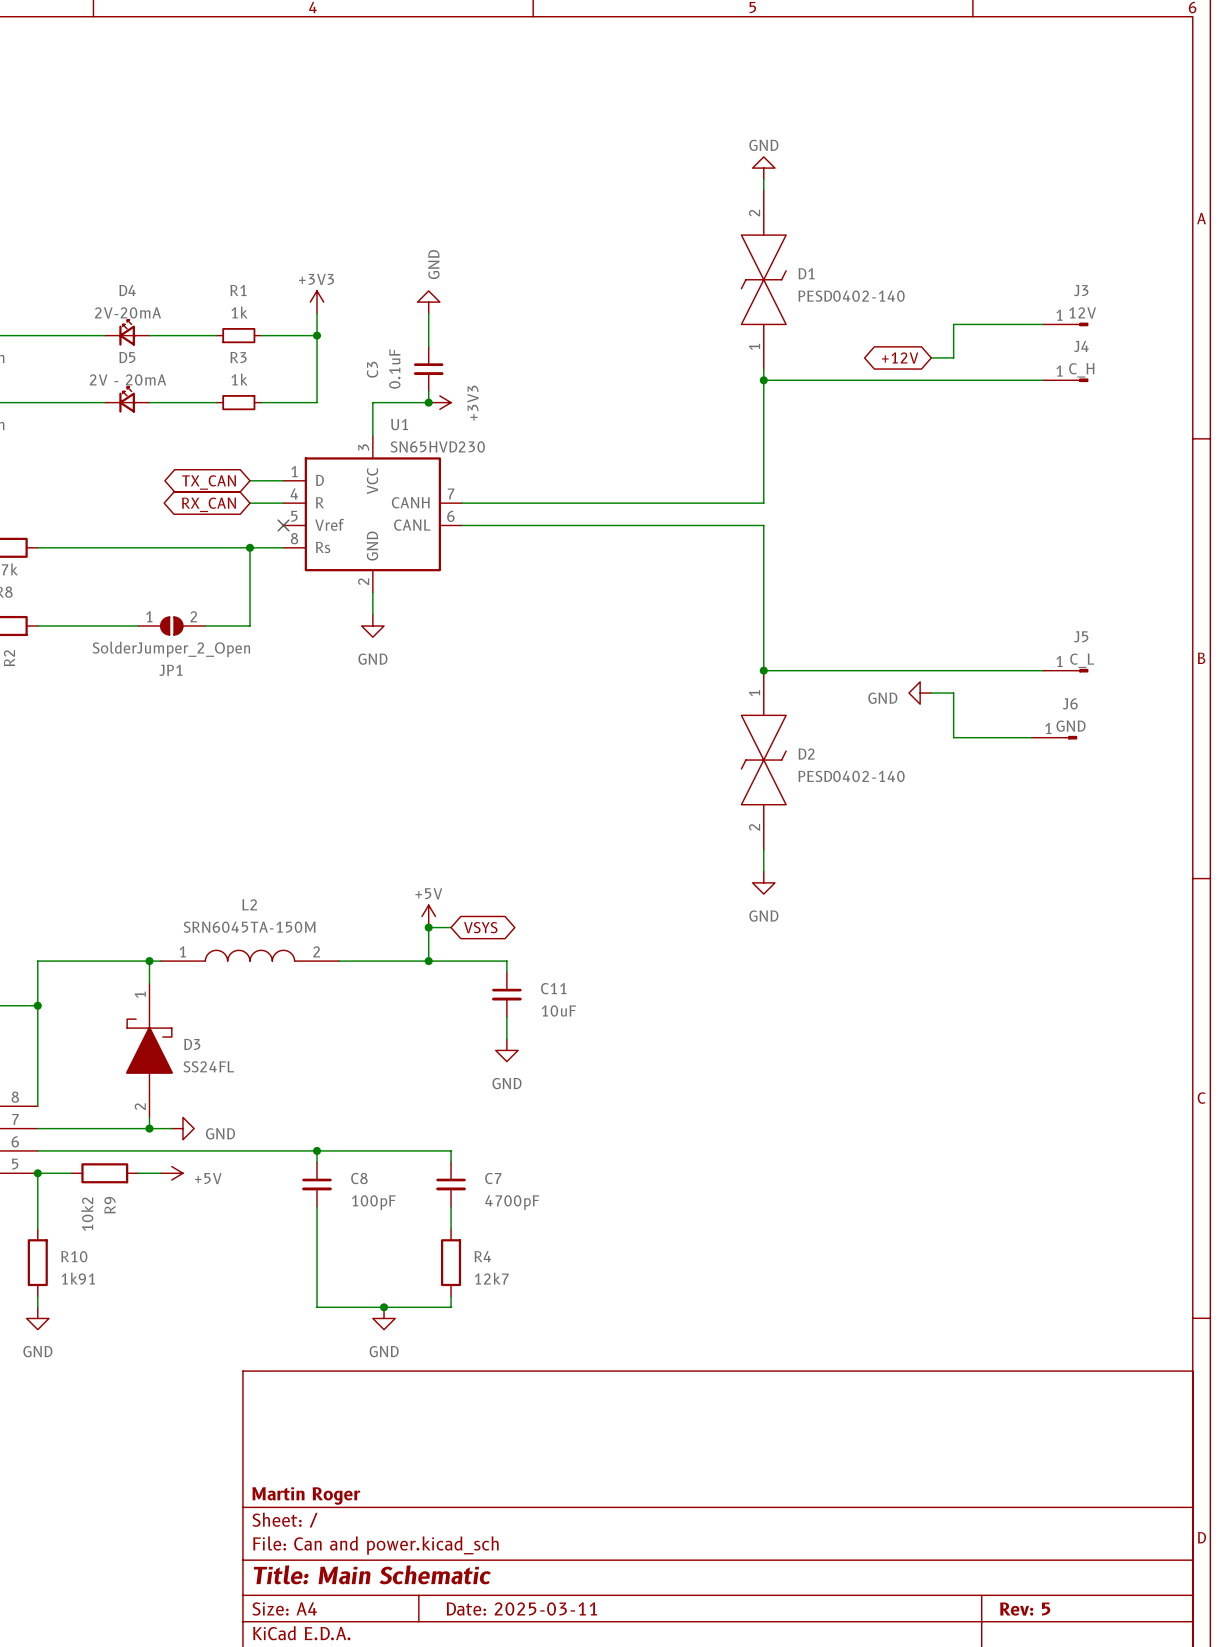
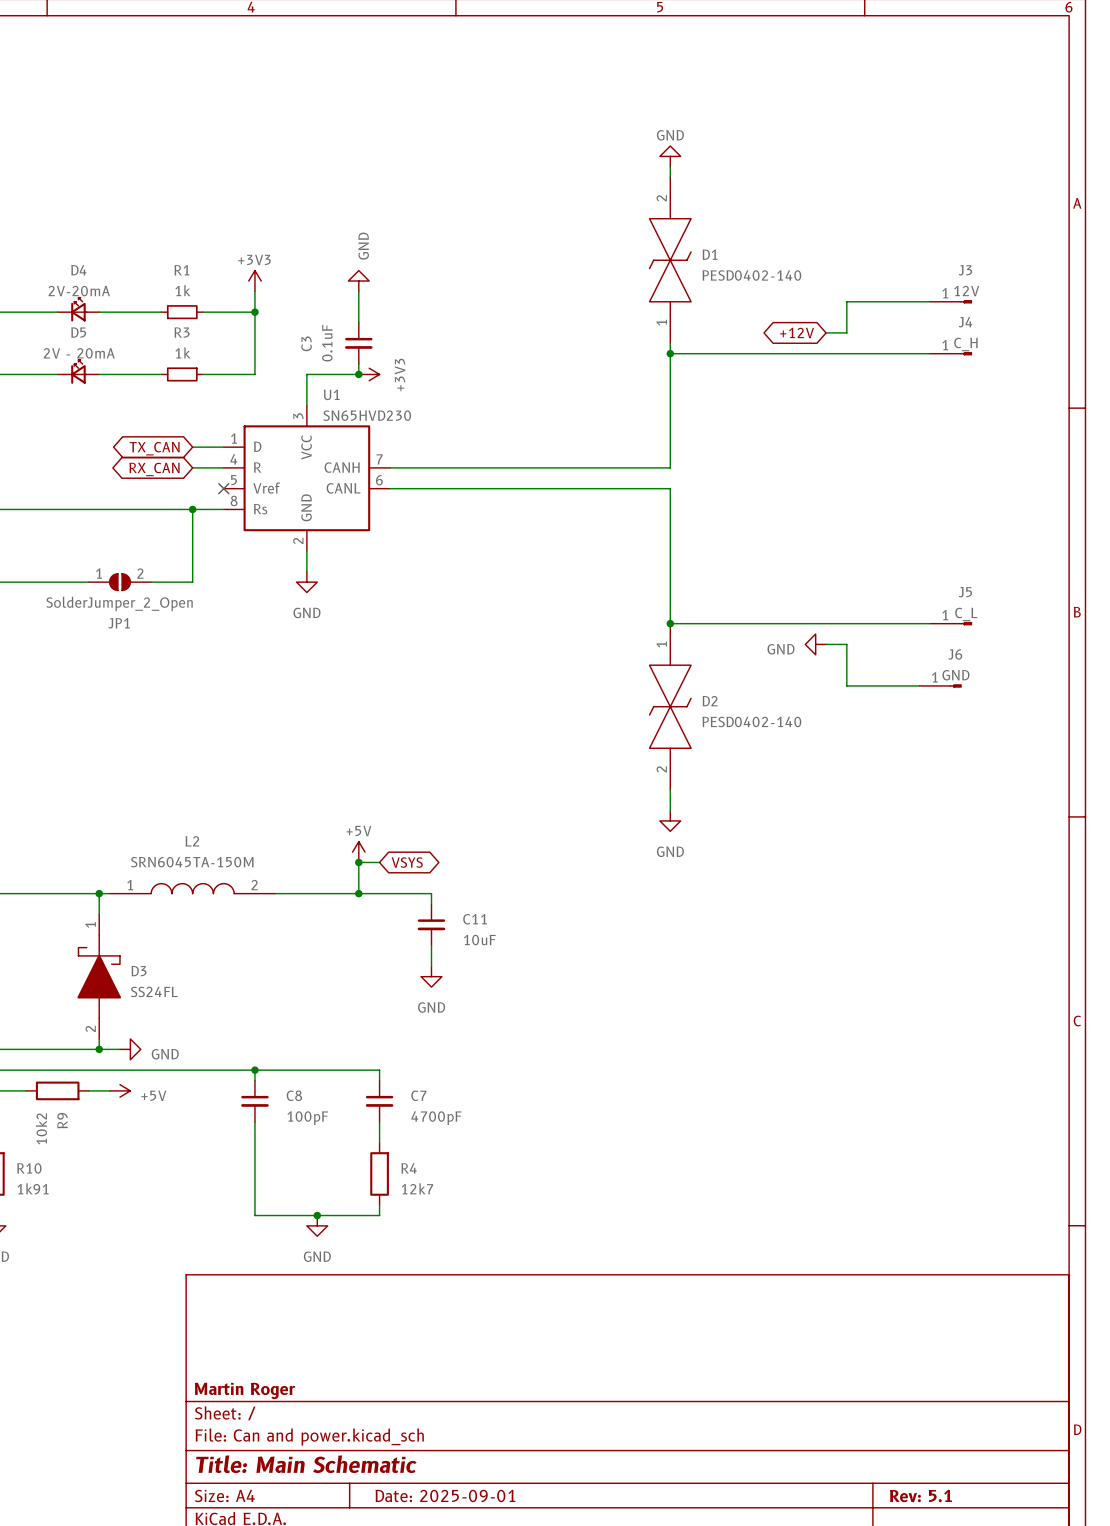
title block: Date: 2025-03-11 (521, 1608) -> Date: 2025-09-01 (445, 1495)
title block: Rev: 5 (1025, 1609) -> Rev: 5.1 (920, 1496)

